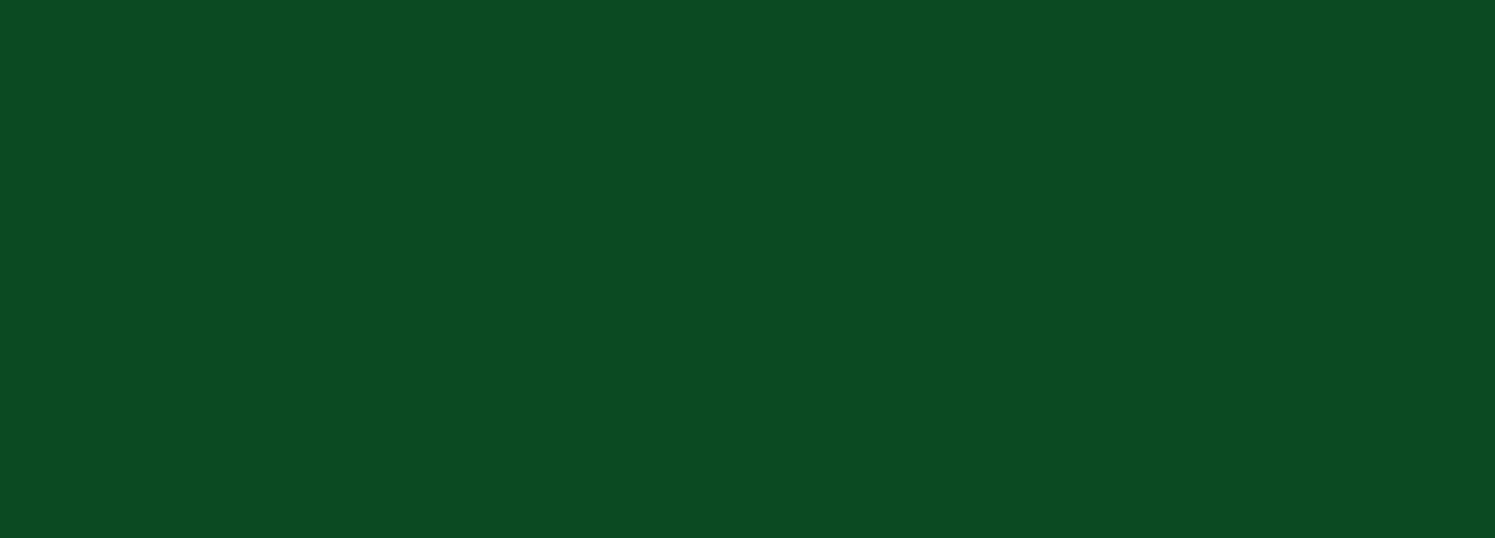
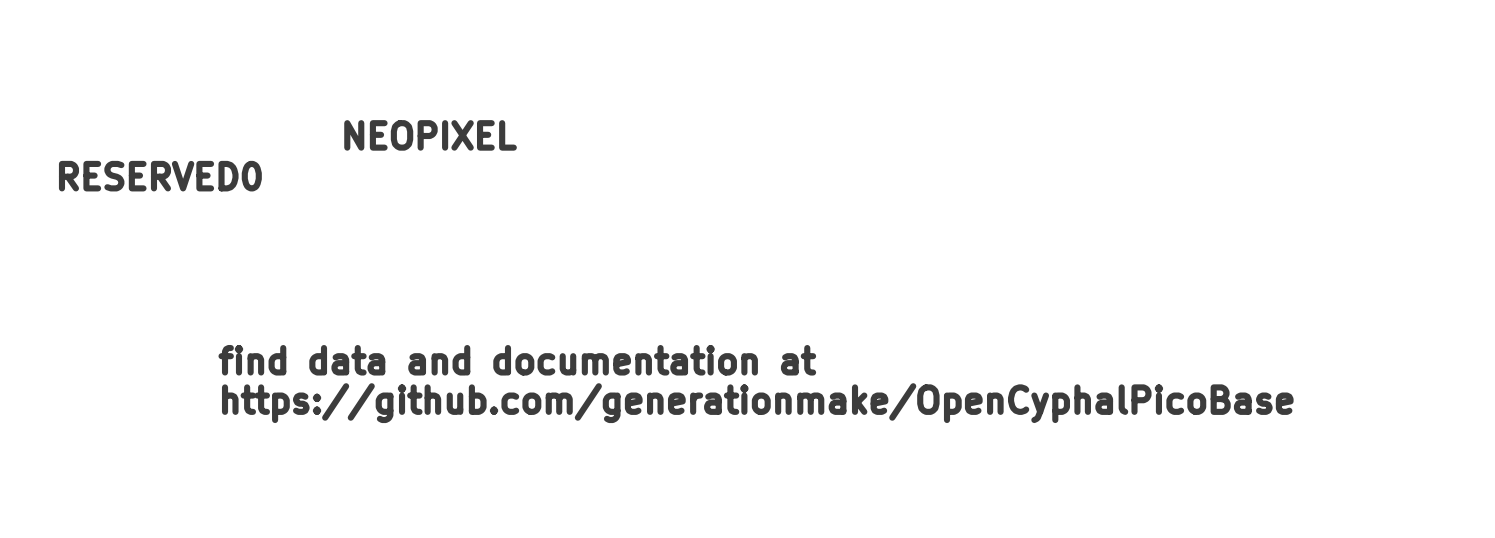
text: none -> NEOPIXEL (430, 135)
text: none -> RESERVED0 (160, 176)
text: none -> find data and documentation at (517, 360)
text: none -> https://github.com/generationmake/OpenCyphalPicoBase (757, 403)

